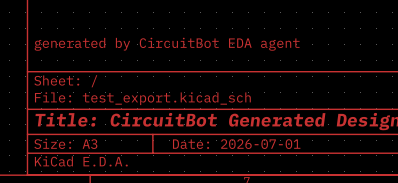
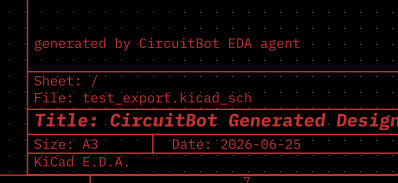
title block: Date: 2026-07-01 (236, 144) -> Date: 2026-06-25 (236, 144)

